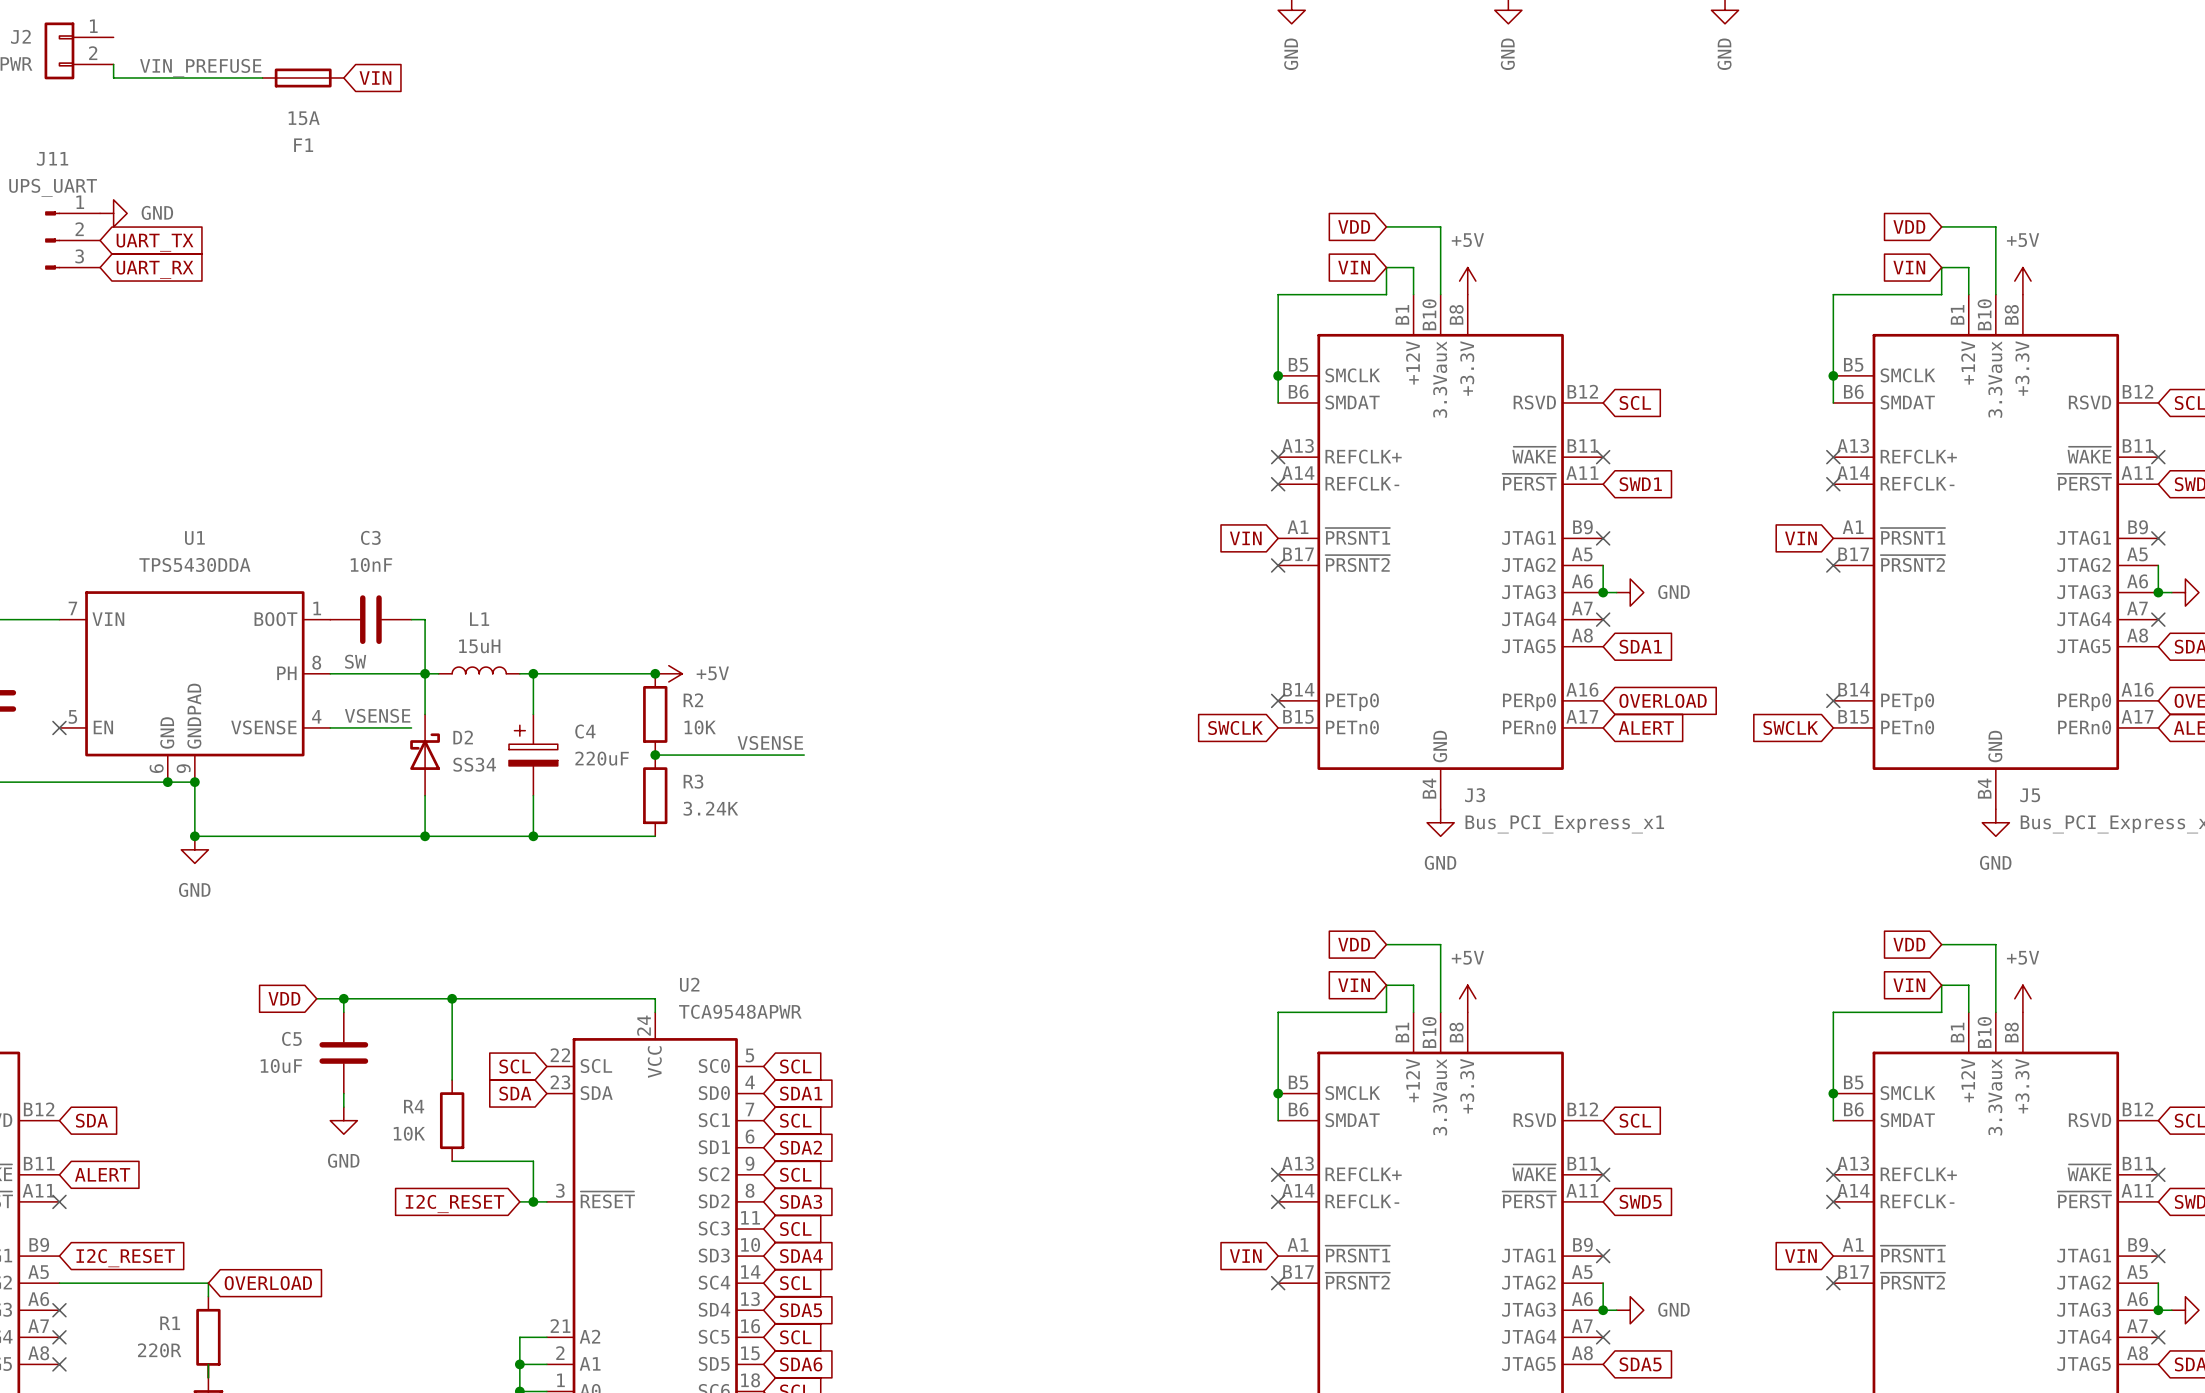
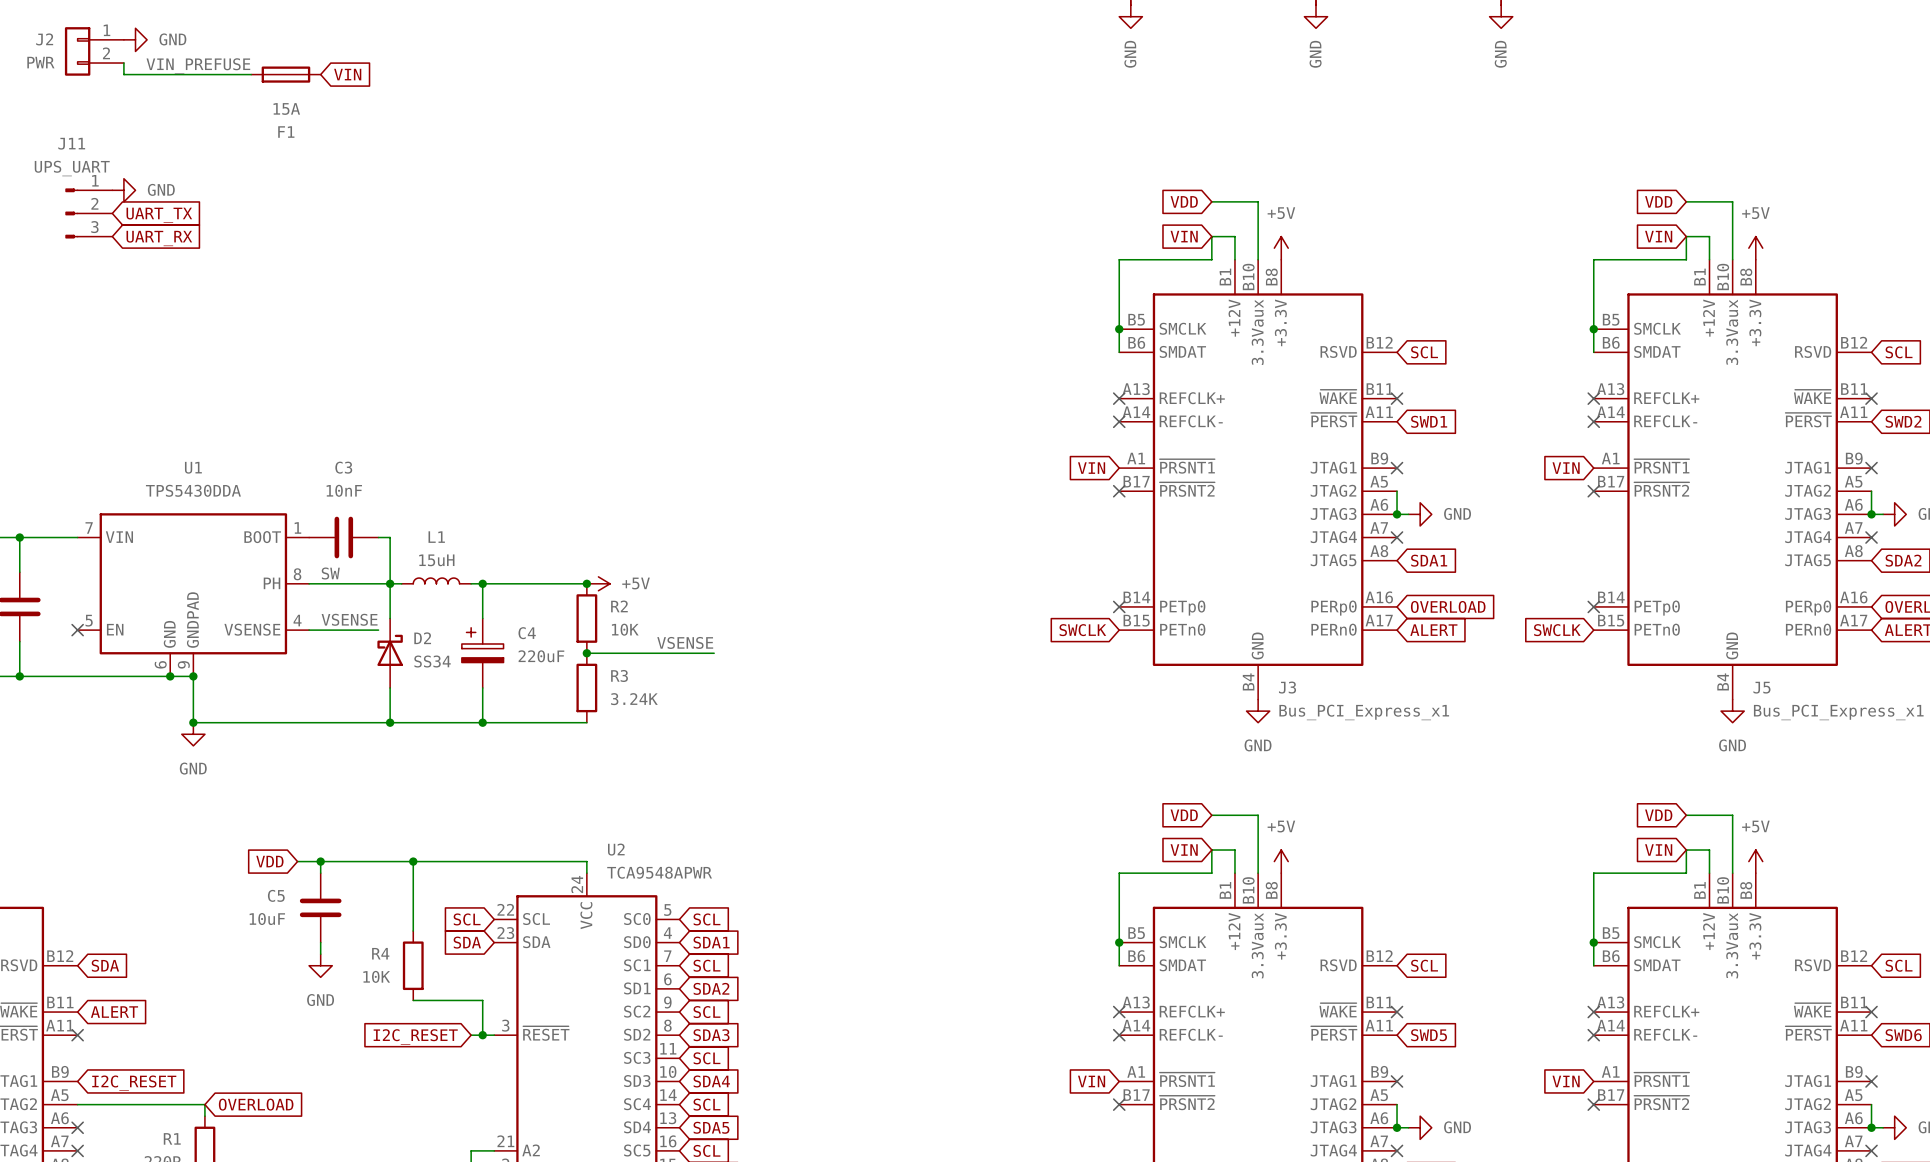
power symbol: none -> GND (135, 39)

